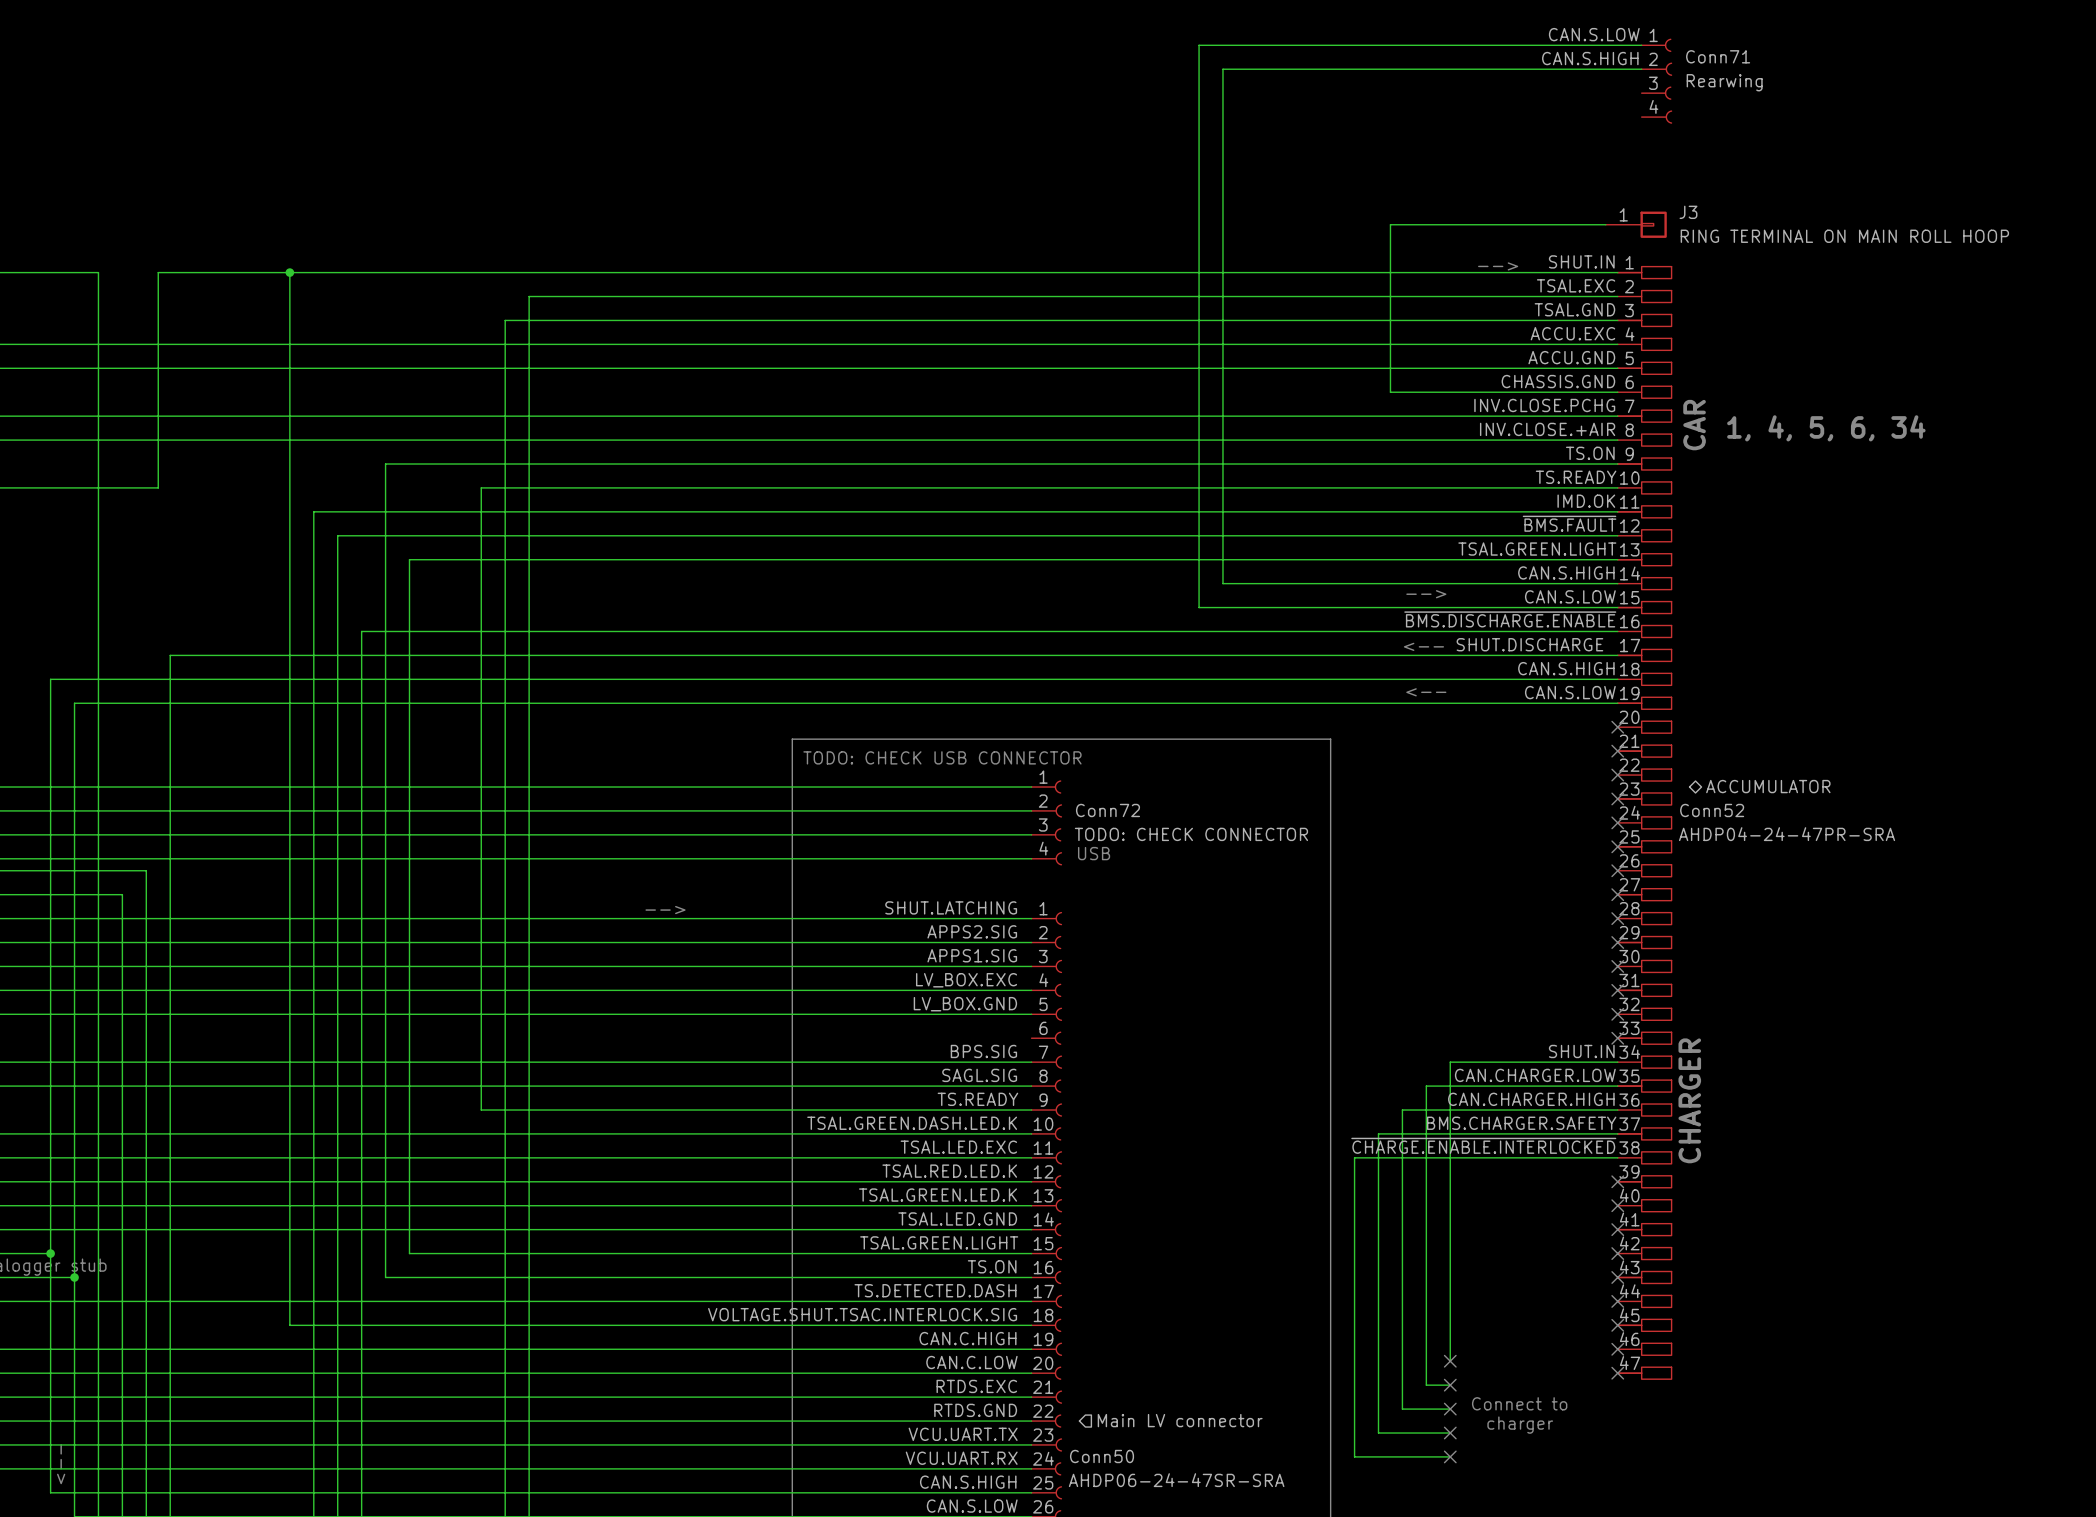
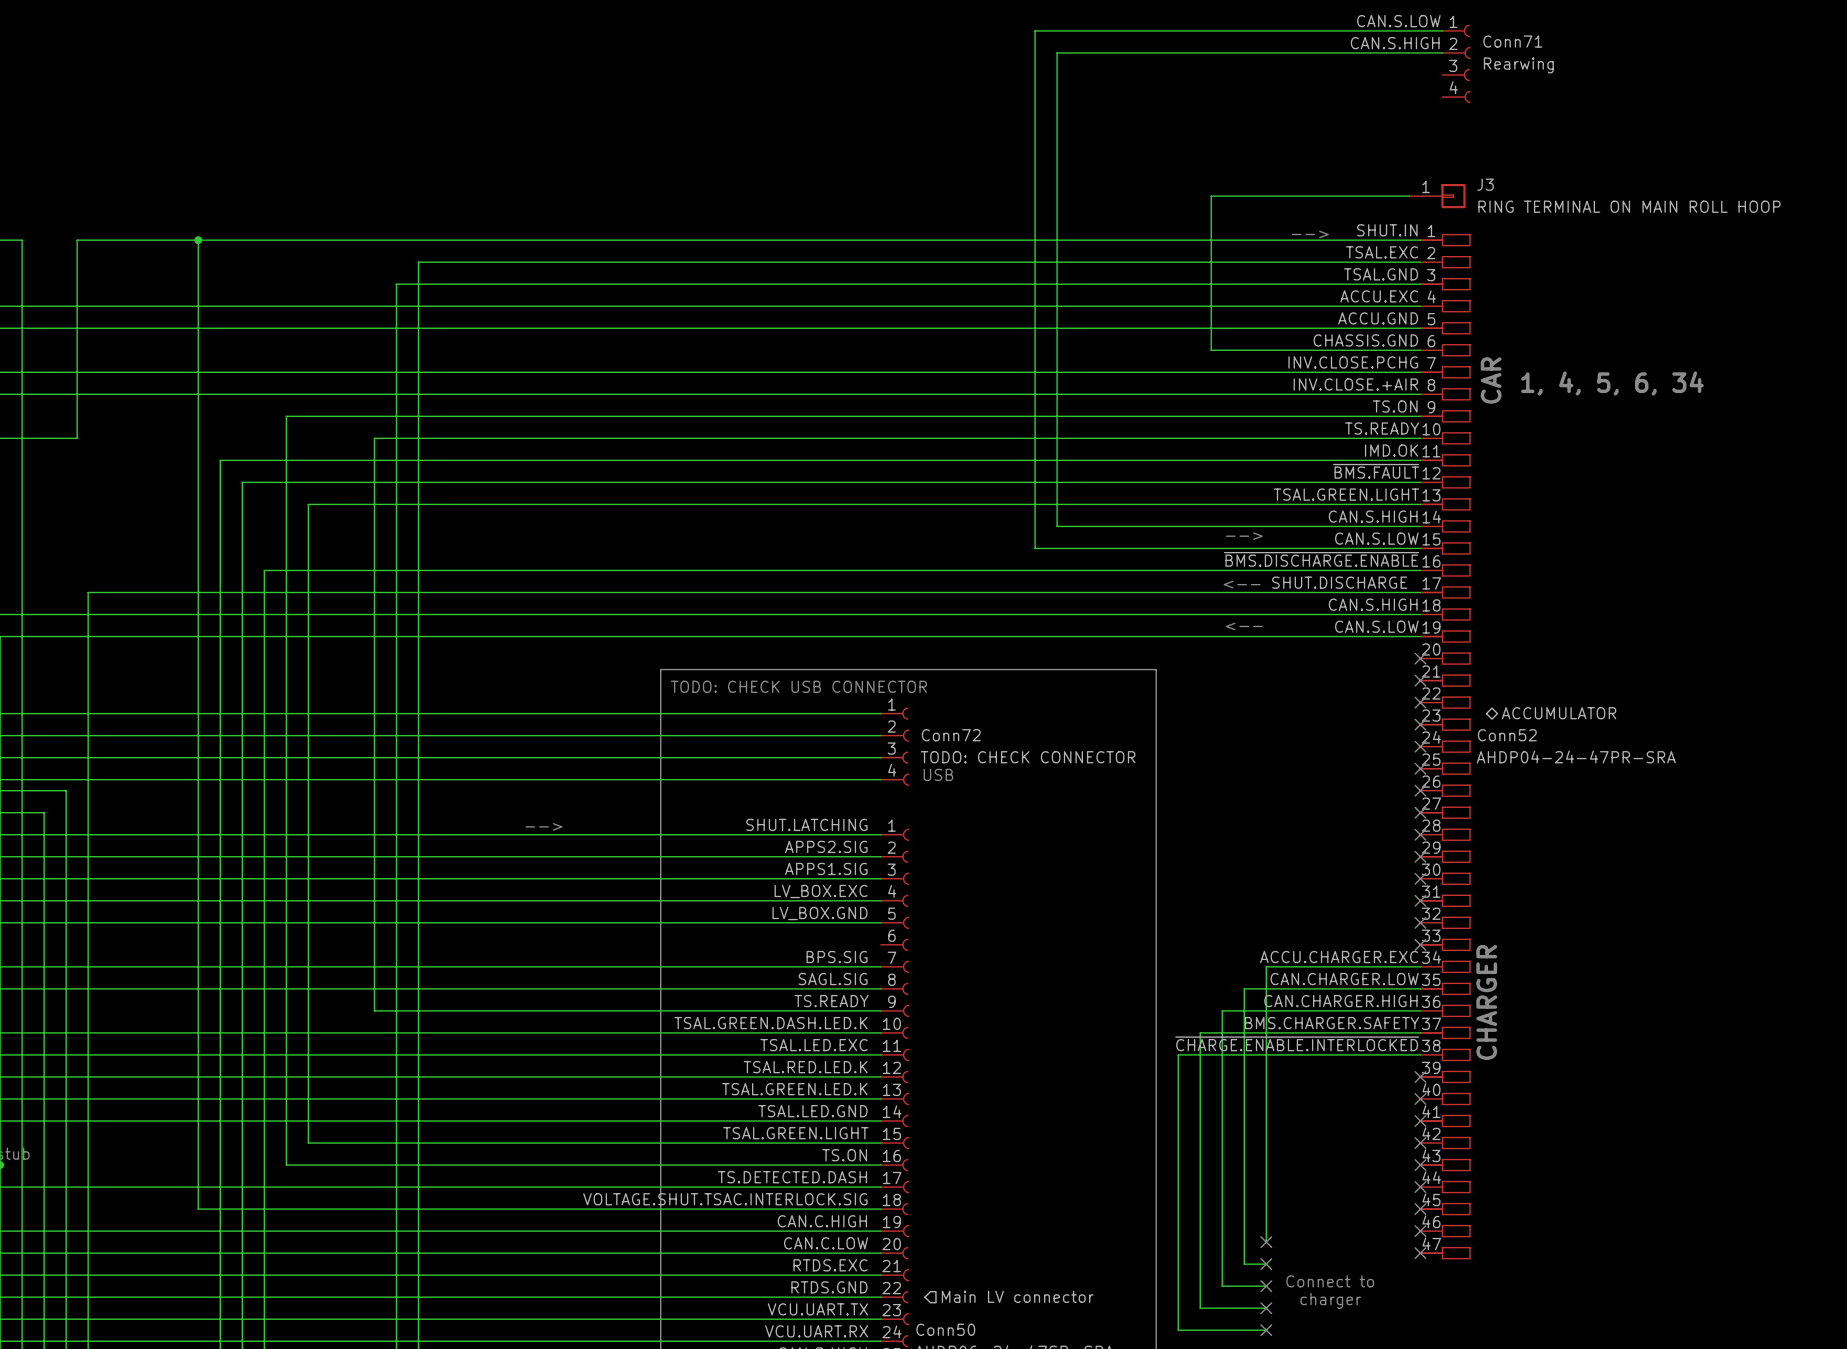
label: SHUT.IN (1581, 1051) -> ACCU.CHARGER.EXC (1339, 957)

